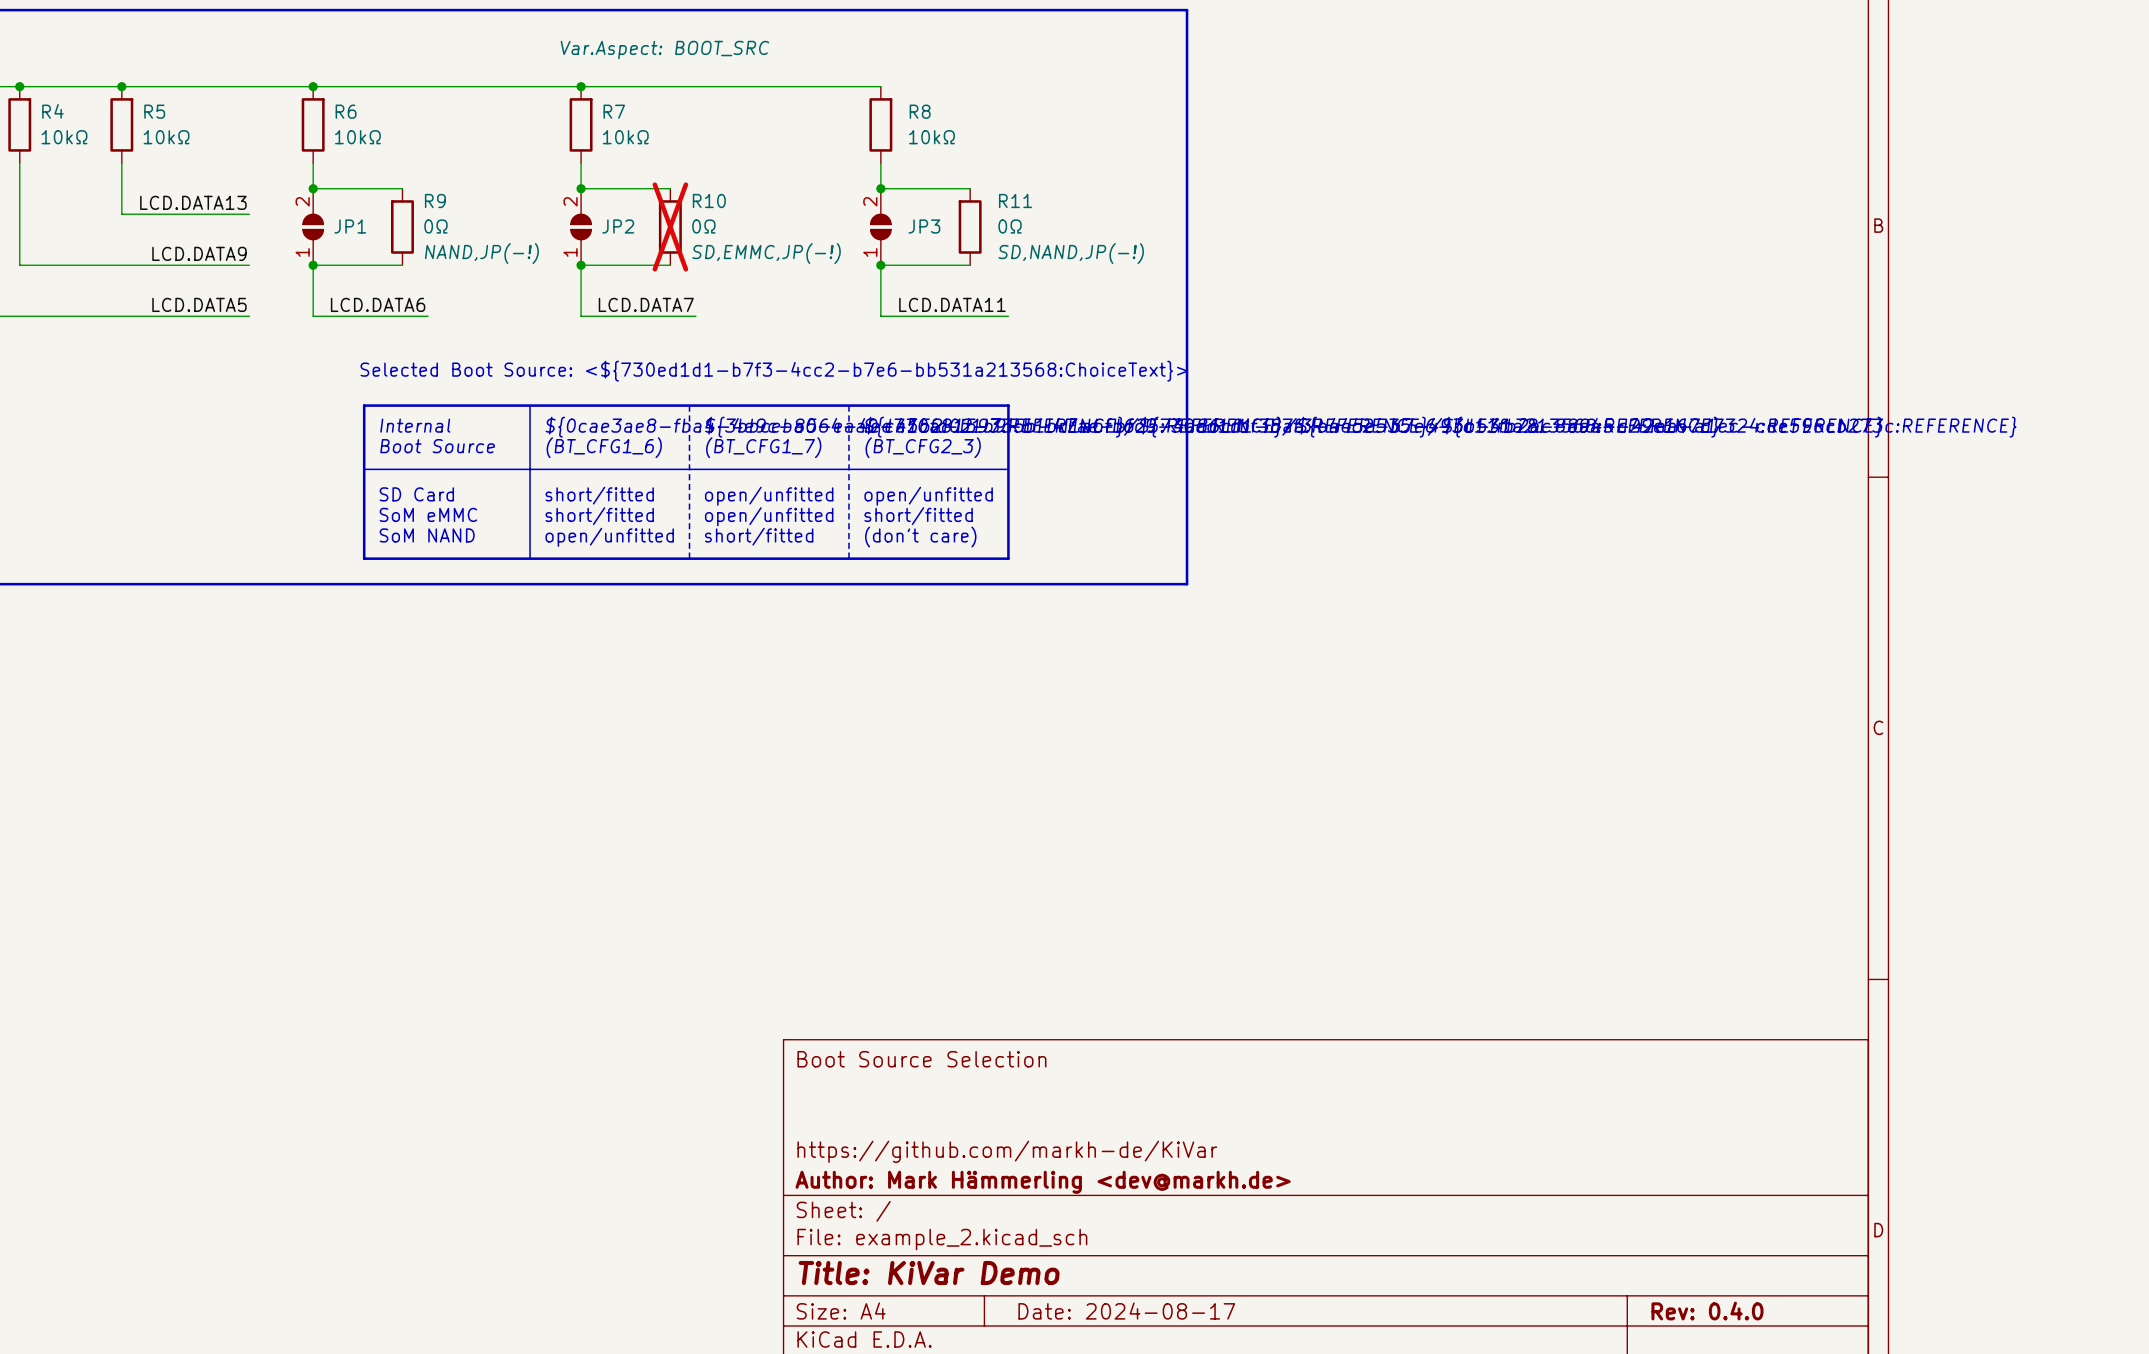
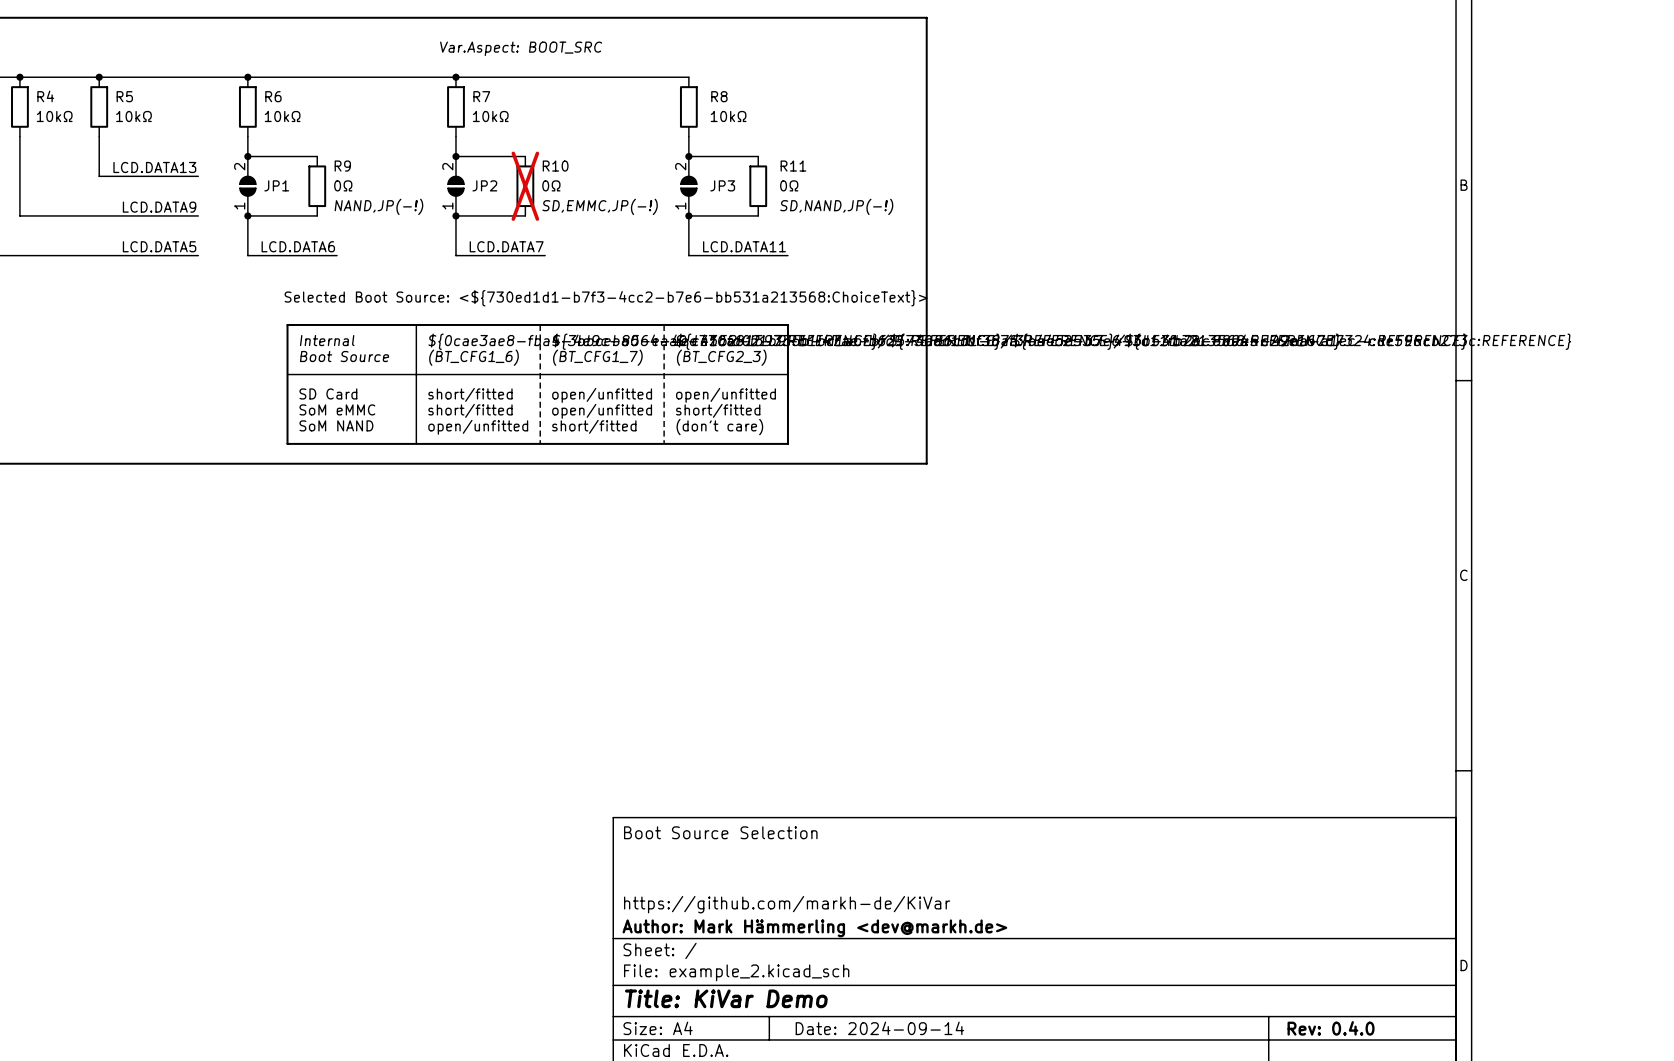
title block: Date: 2024-08-17 (1126, 1311) -> Date: 2024-09-14 (879, 1028)

